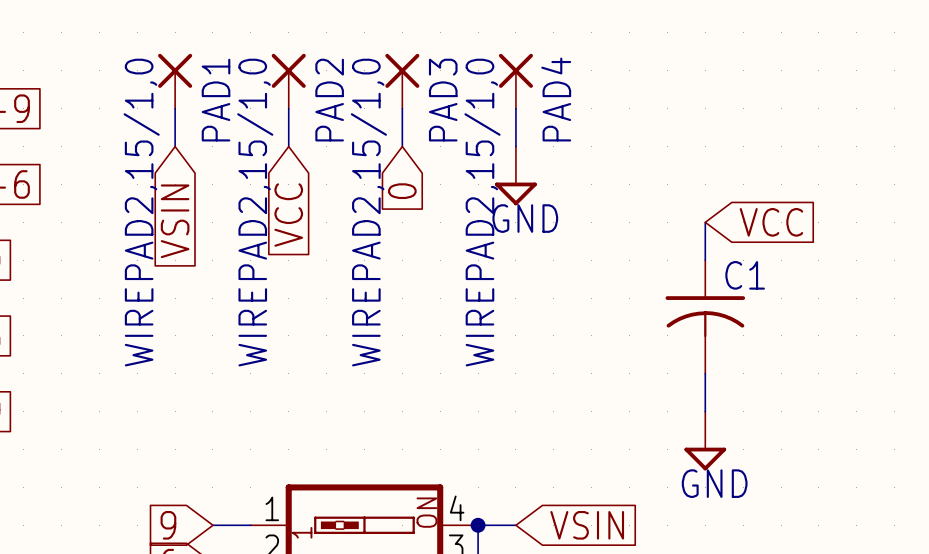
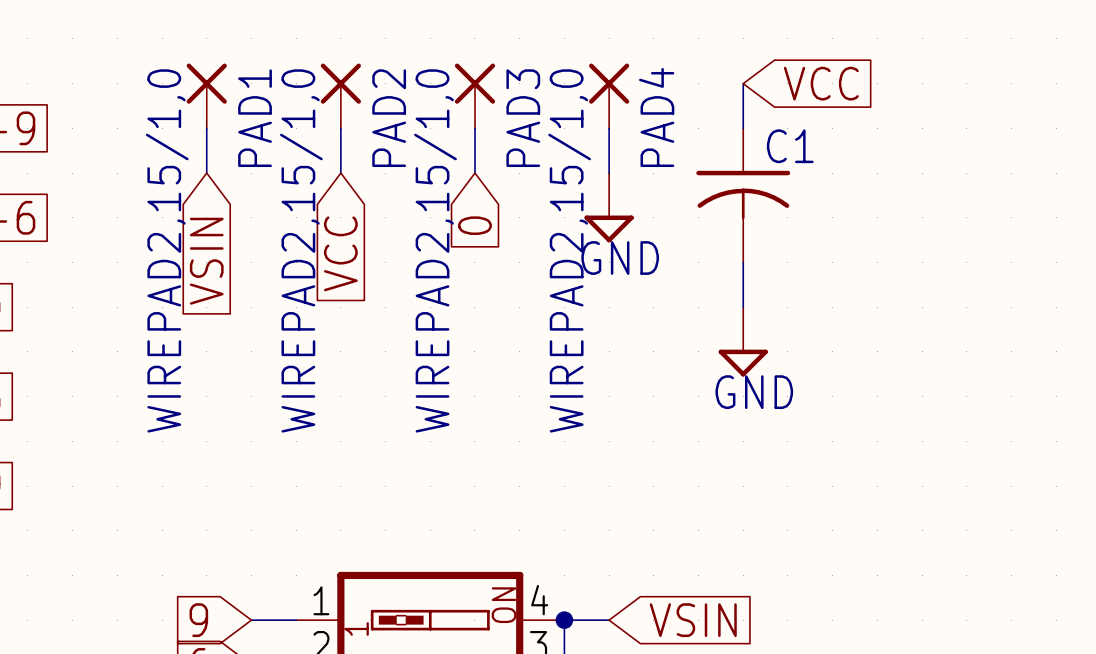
wire: (705, 222) (705, 260) -> (743, 262) (743, 307)
global label position: VCC (771, 222) -> VCC (821, 83)
C1 position: (705, 317) -> (743, 195)
wire: (705, 373) (705, 411) -> (743, 83) (743, 128)
power symbol position: GND (705, 441) -> GND (743, 341)

